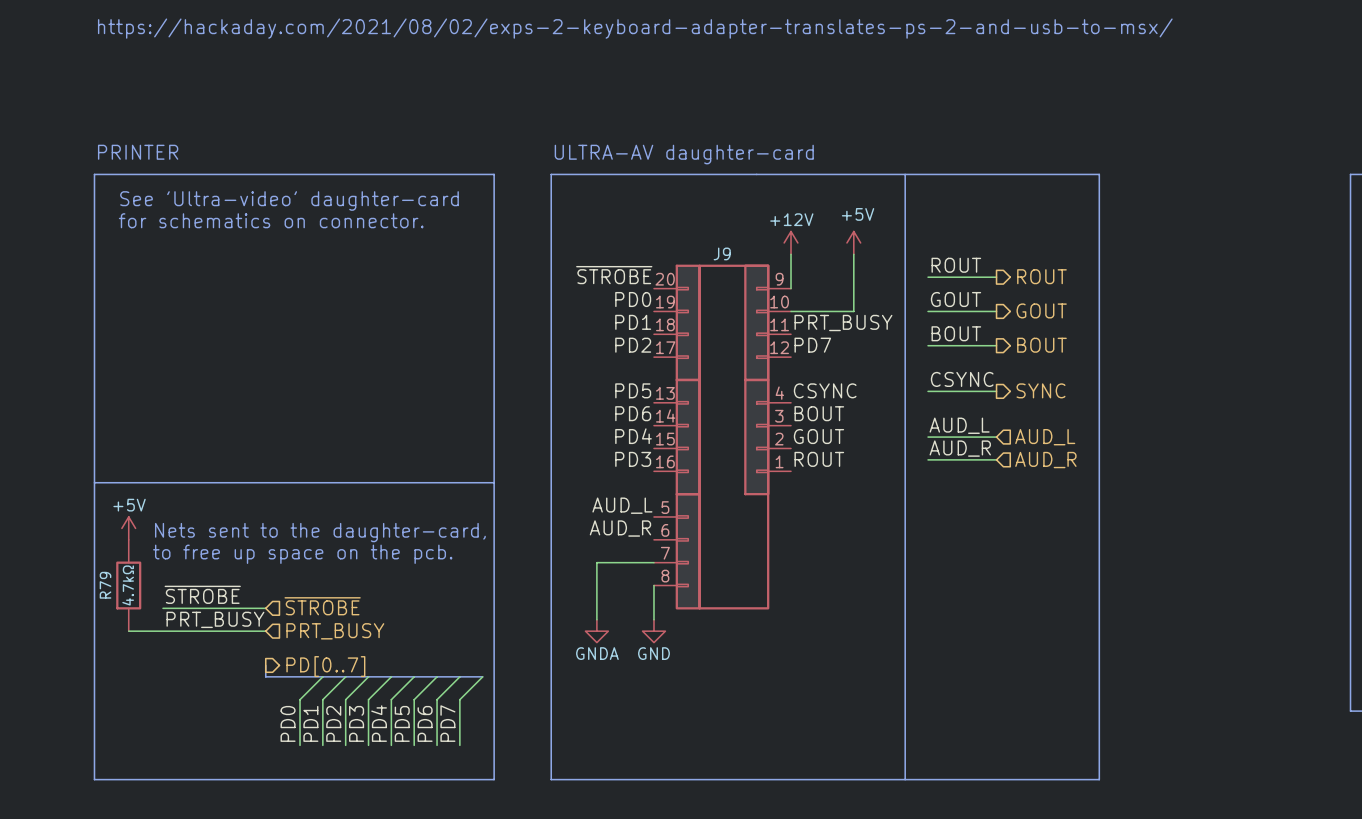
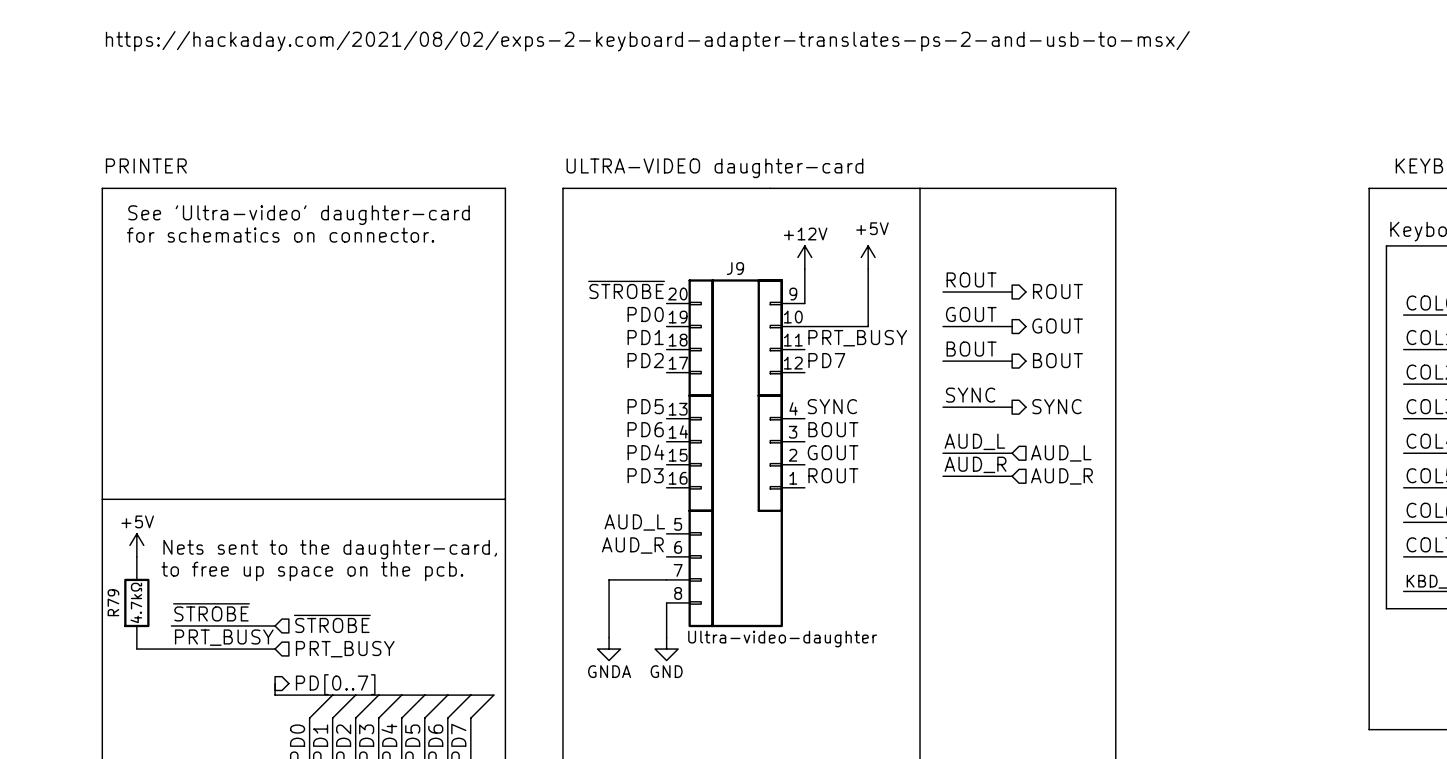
text: ULTRA-AV daughter-card (684, 154) -> ULTRA-VIDEO daughter-card (714, 168)
label: CSYNC (962, 379) -> SYNC (970, 395)
label: CSYNC (825, 390) -> SYNC (832, 406)
J9 value: none -> Ultra-video-daughter (782, 639)

